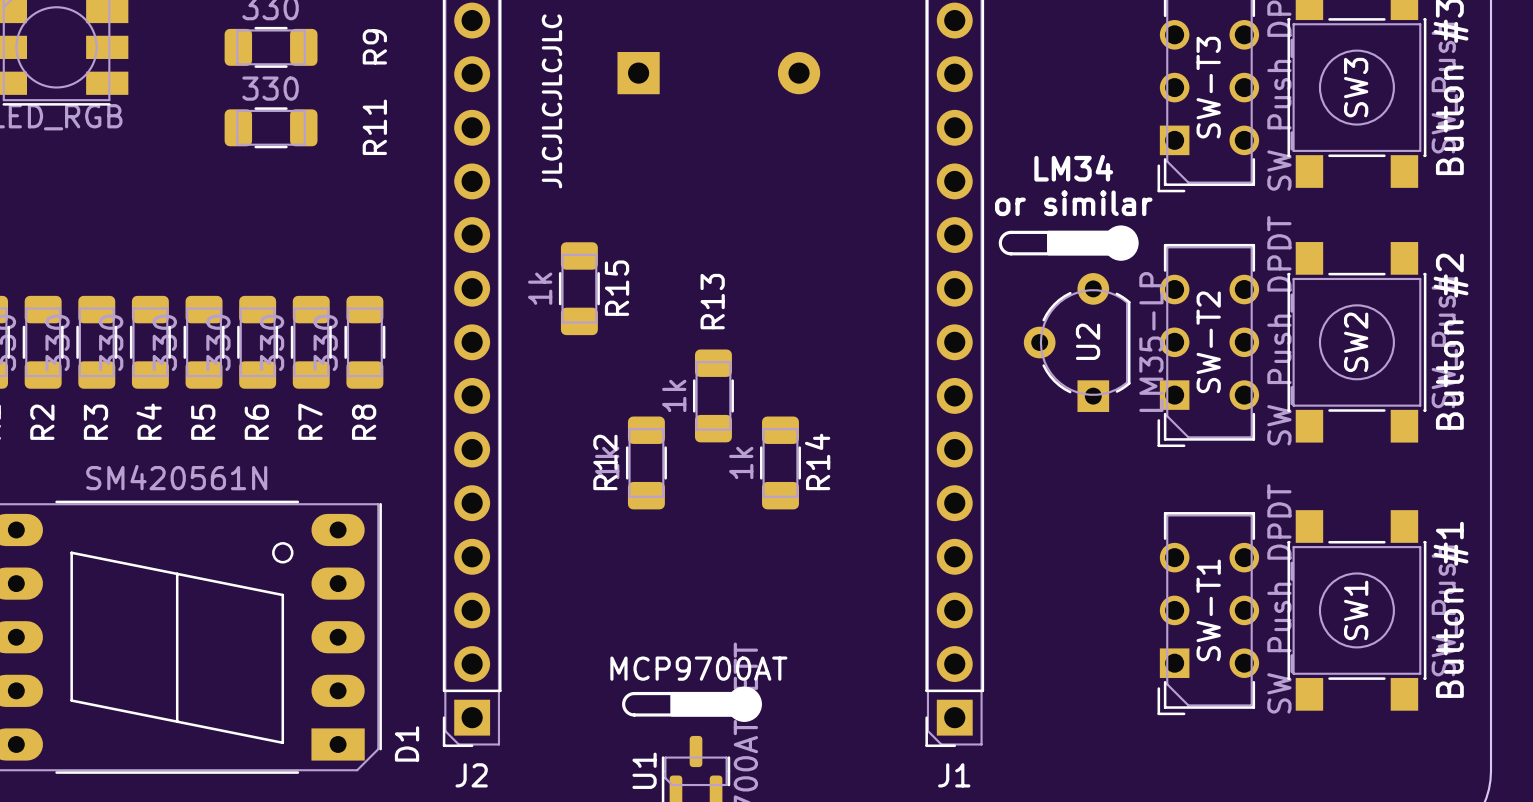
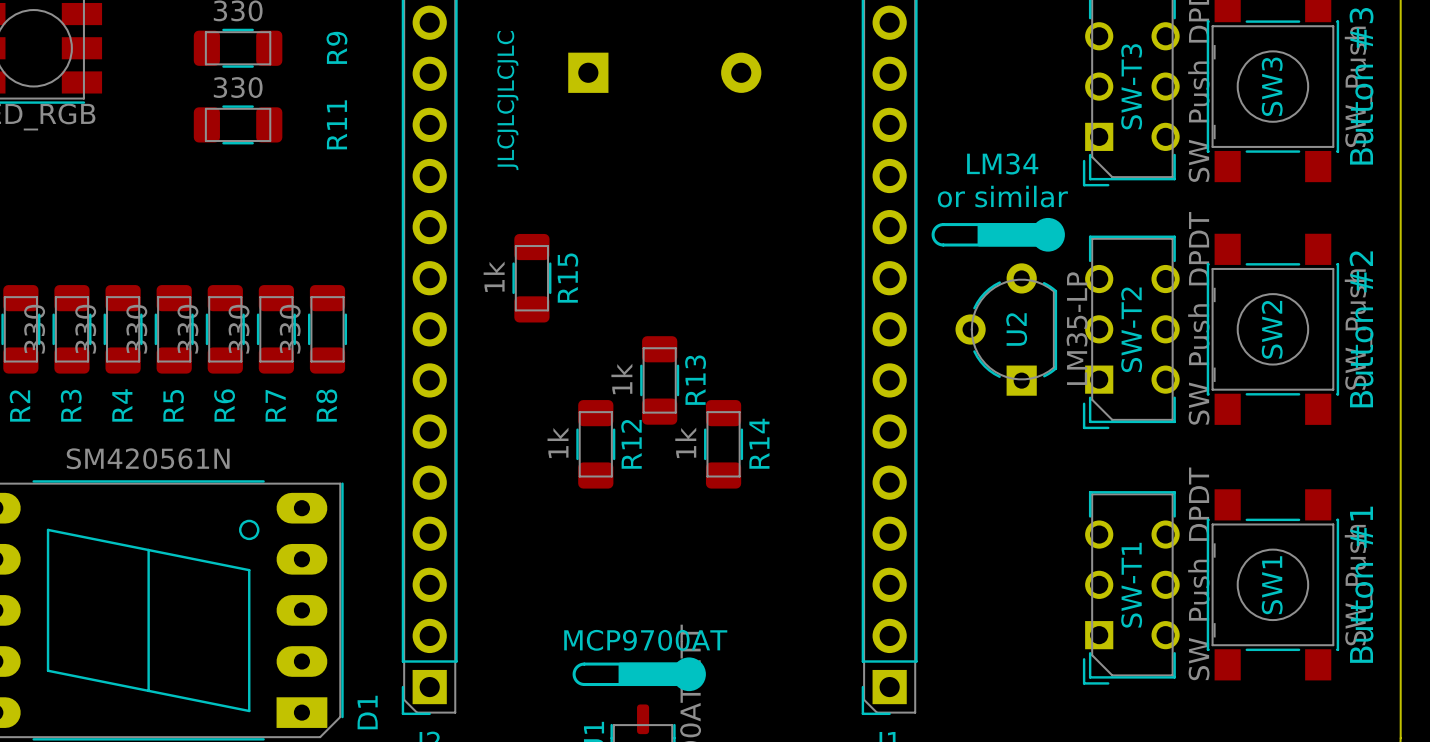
R13 name position: R13 (712, 301) -> R13 (695, 380)
R12 name position: R12 (605, 462) -> R12 (631, 444)

